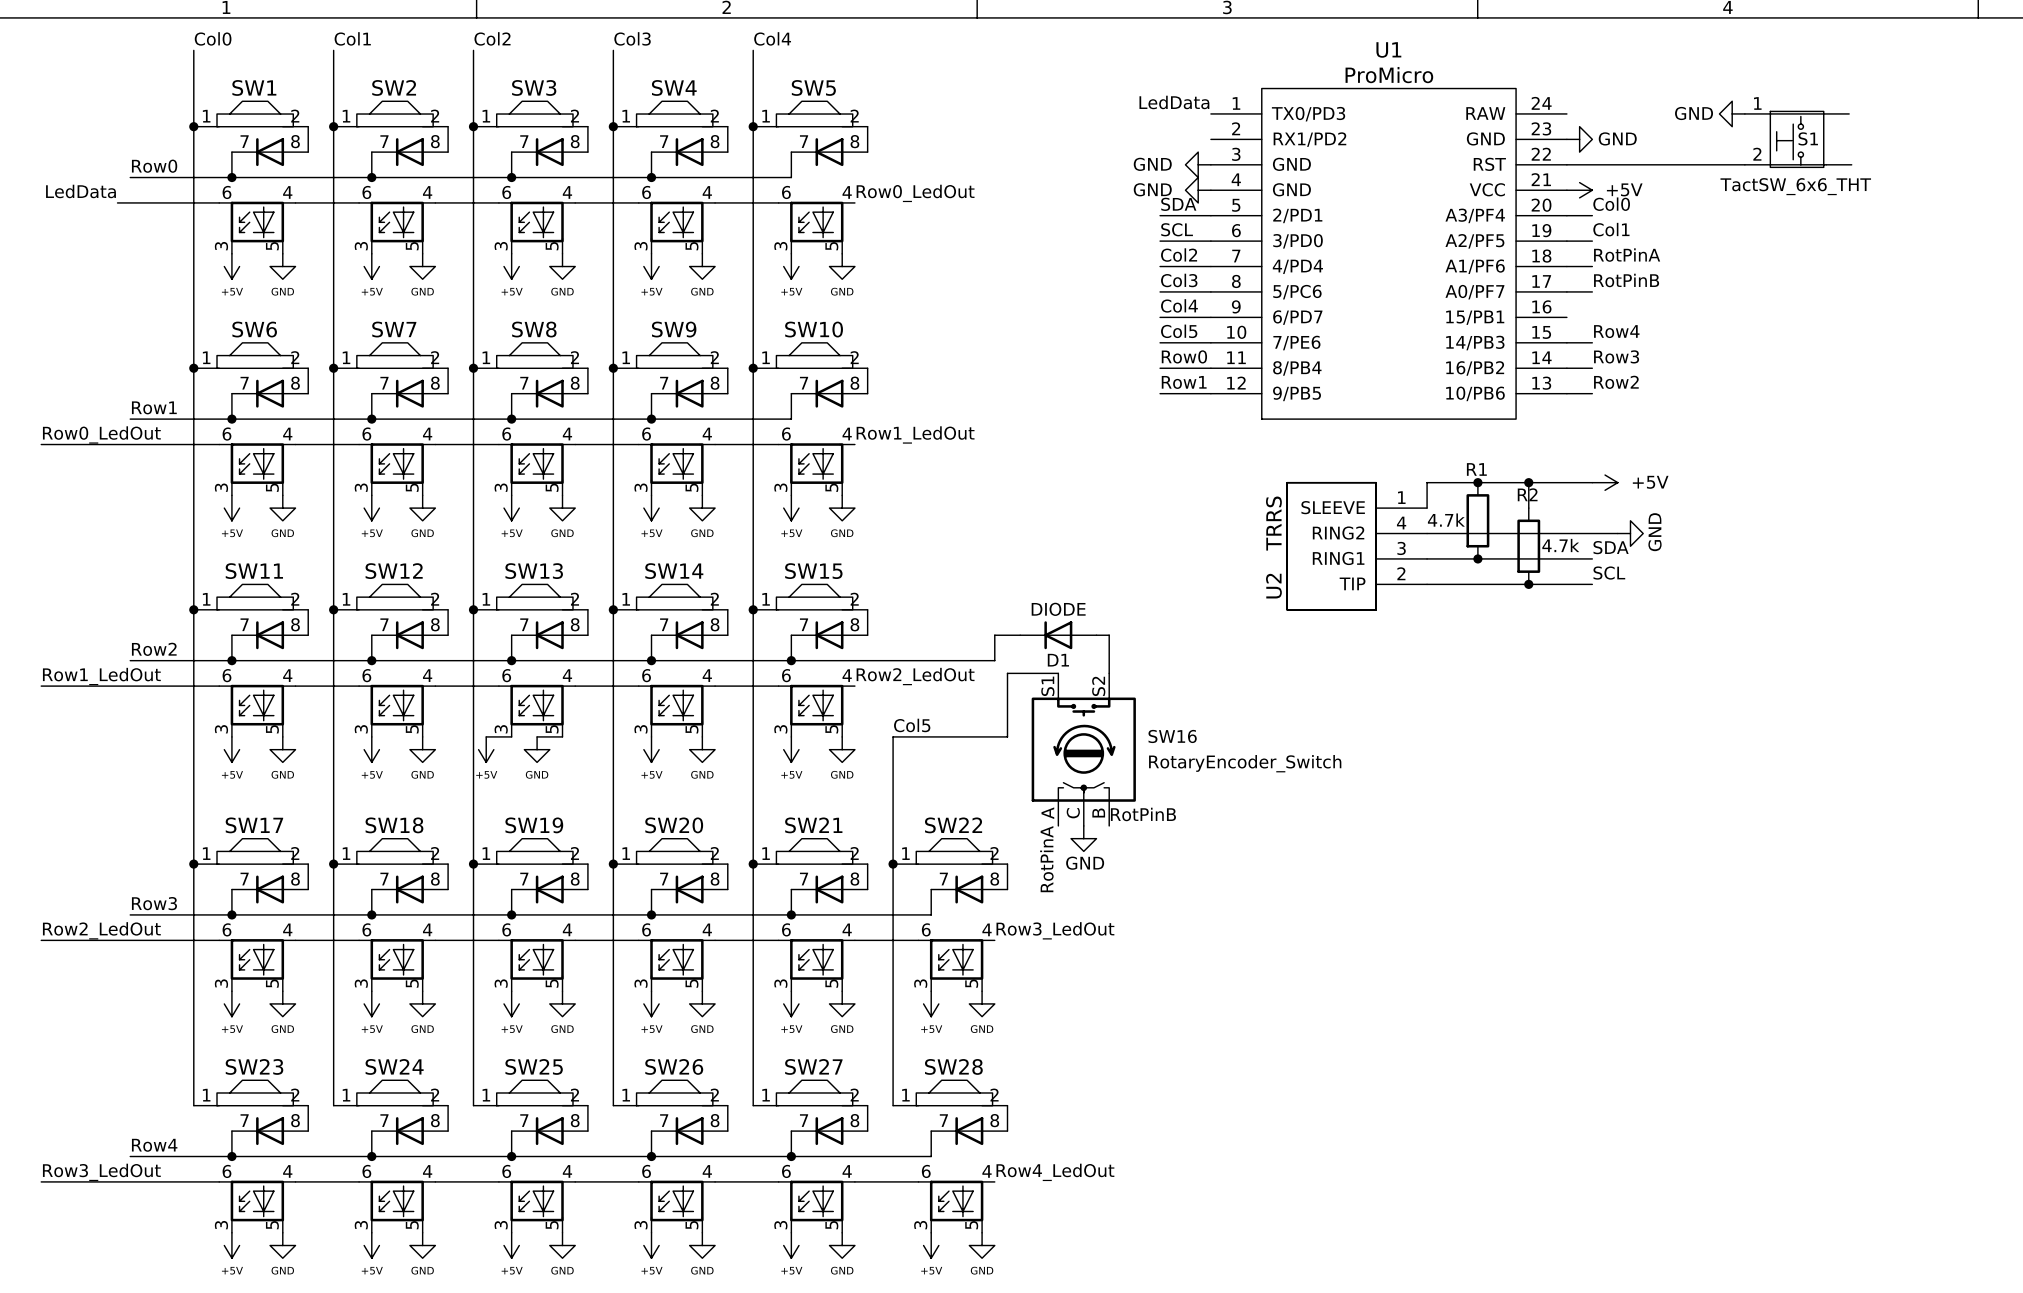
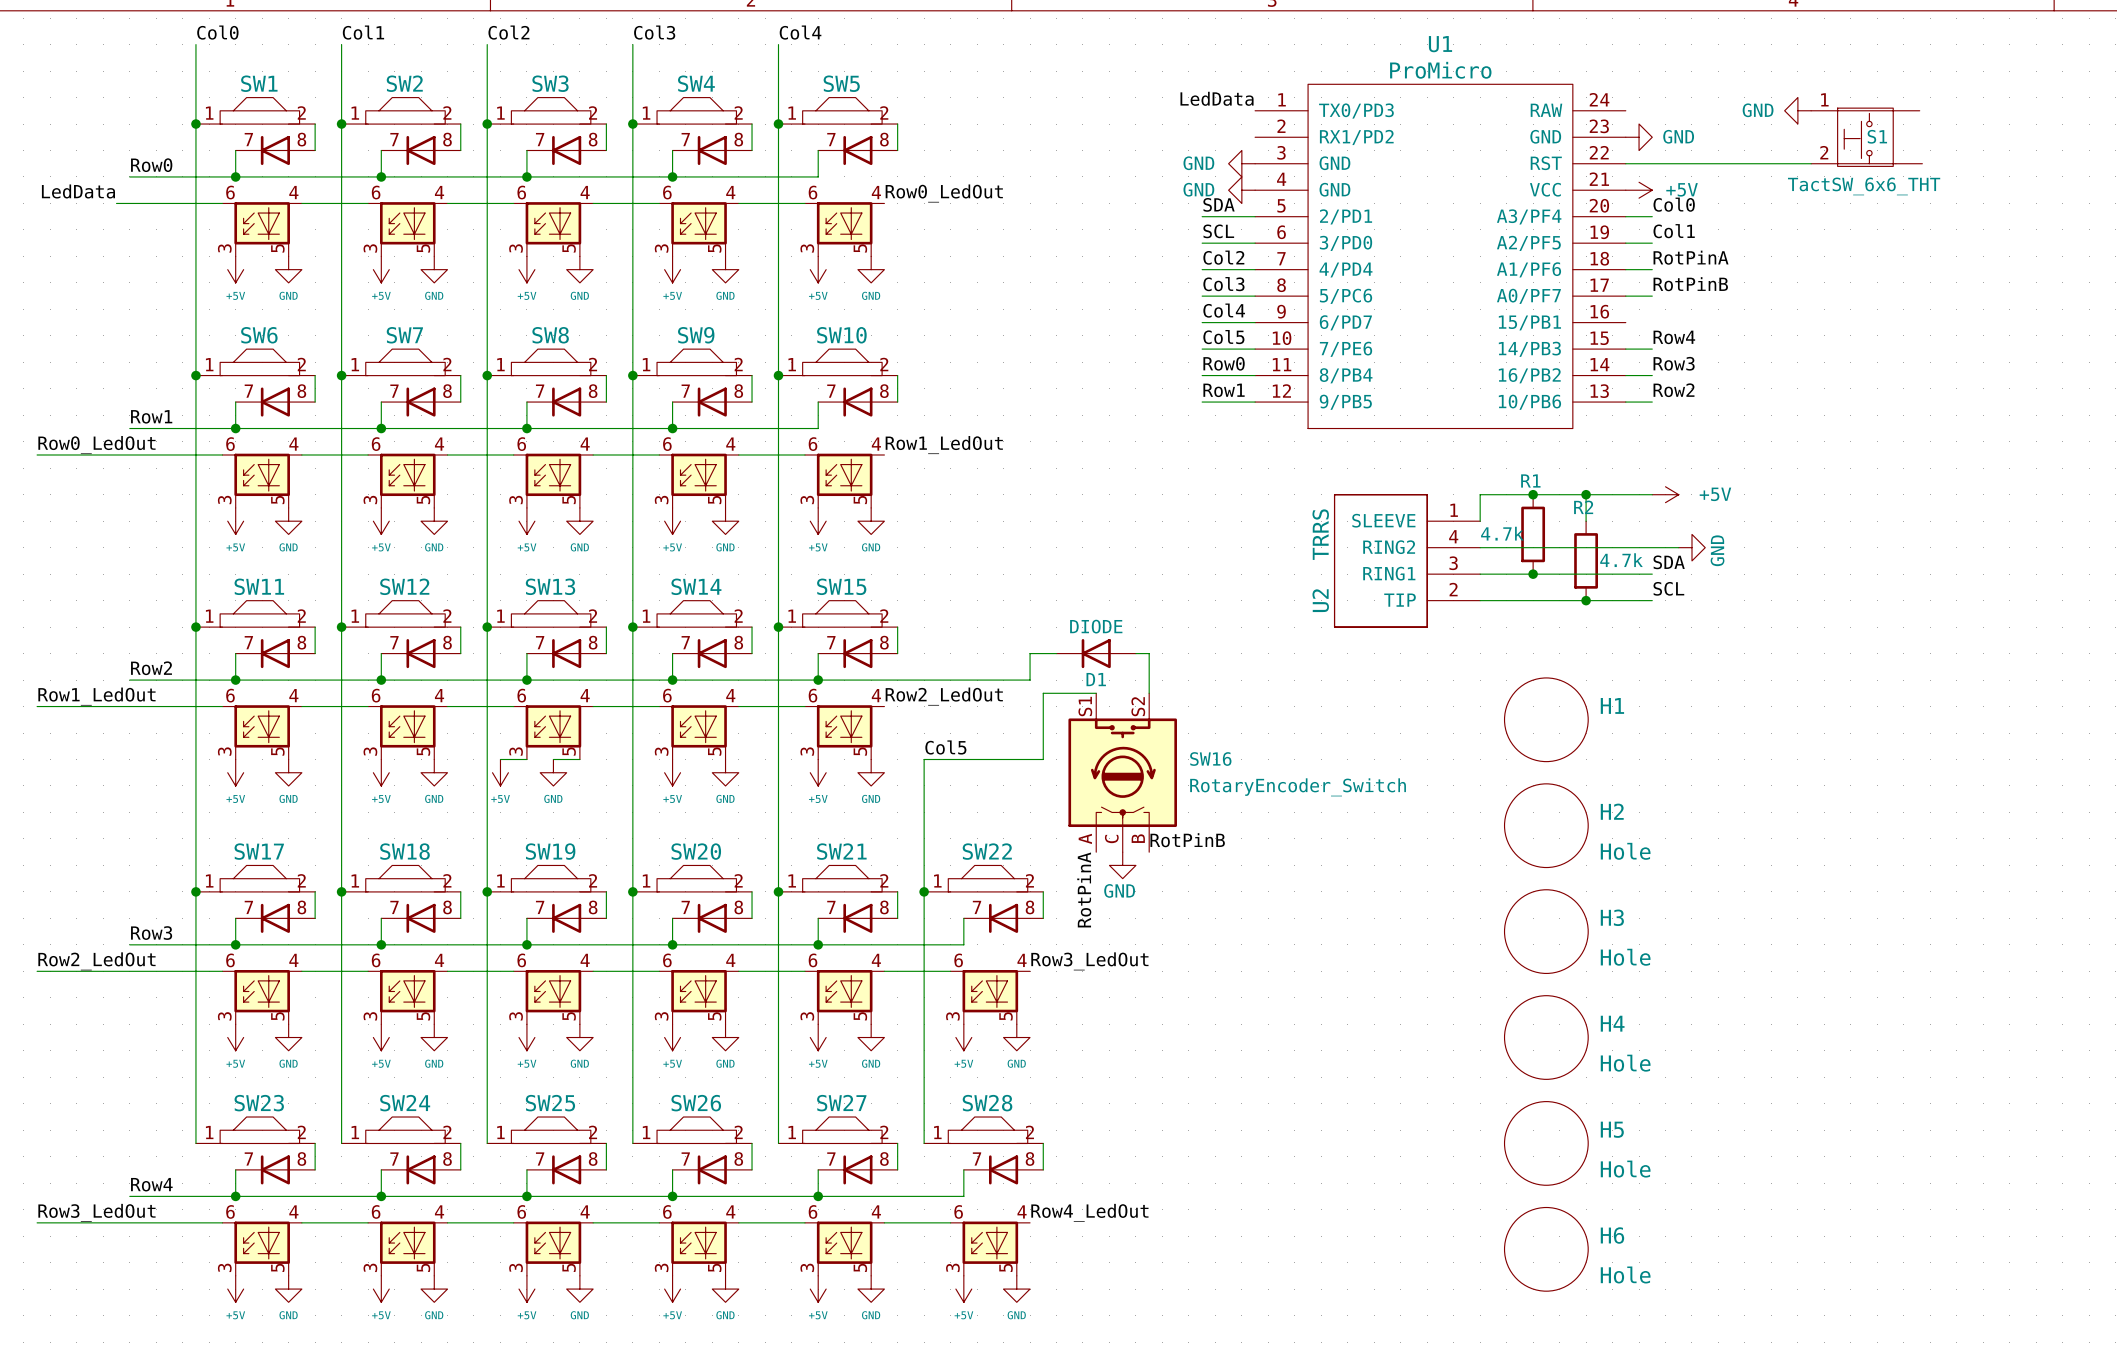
H1: none -> (1546, 719)
H2: none -> Hole (1546, 825)
H3: none -> Hole (1546, 931)
H4: none -> Hole (1546, 1037)
H5: none -> Hole (1546, 1143)
H6: none -> Hole (1546, 1249)

